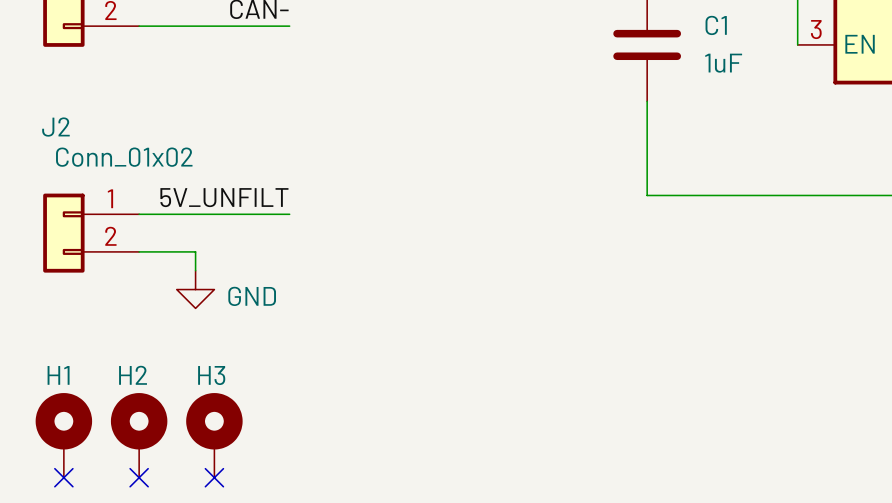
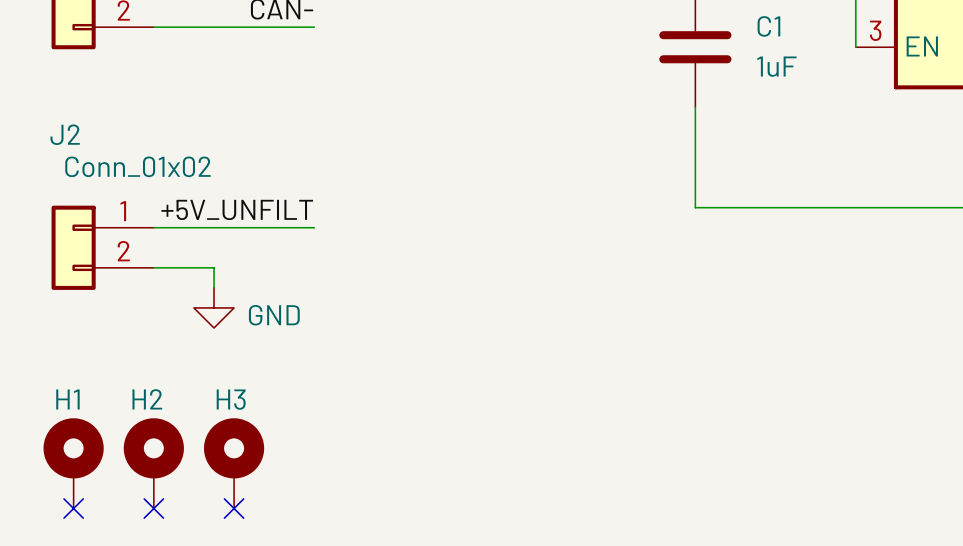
label: 5V_UNFILT (224, 197) -> +5V_UNFILT (237, 209)

